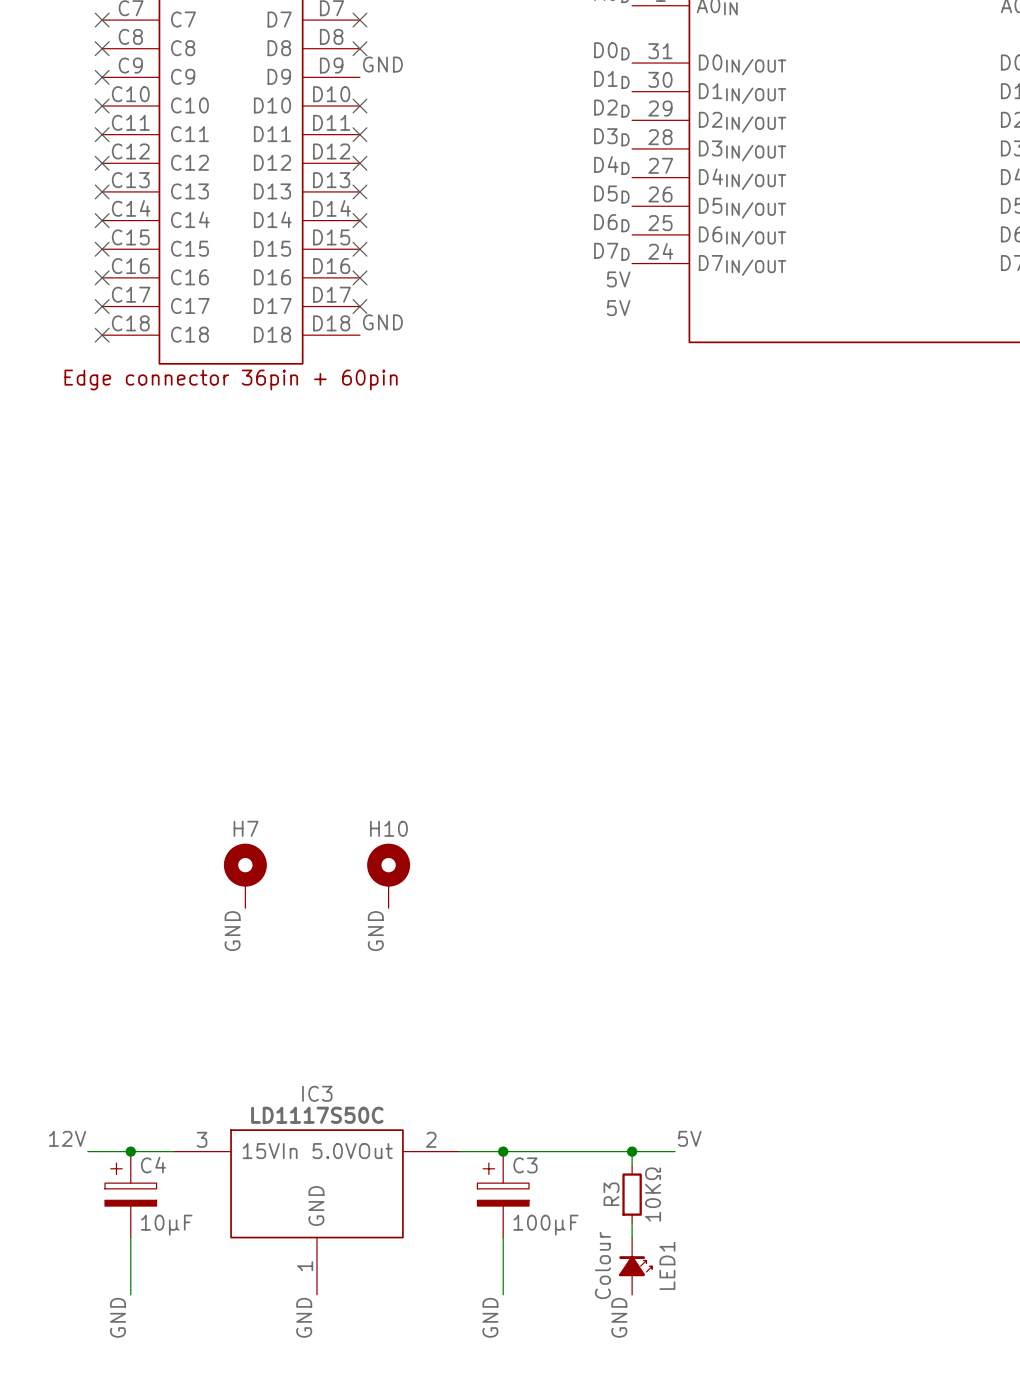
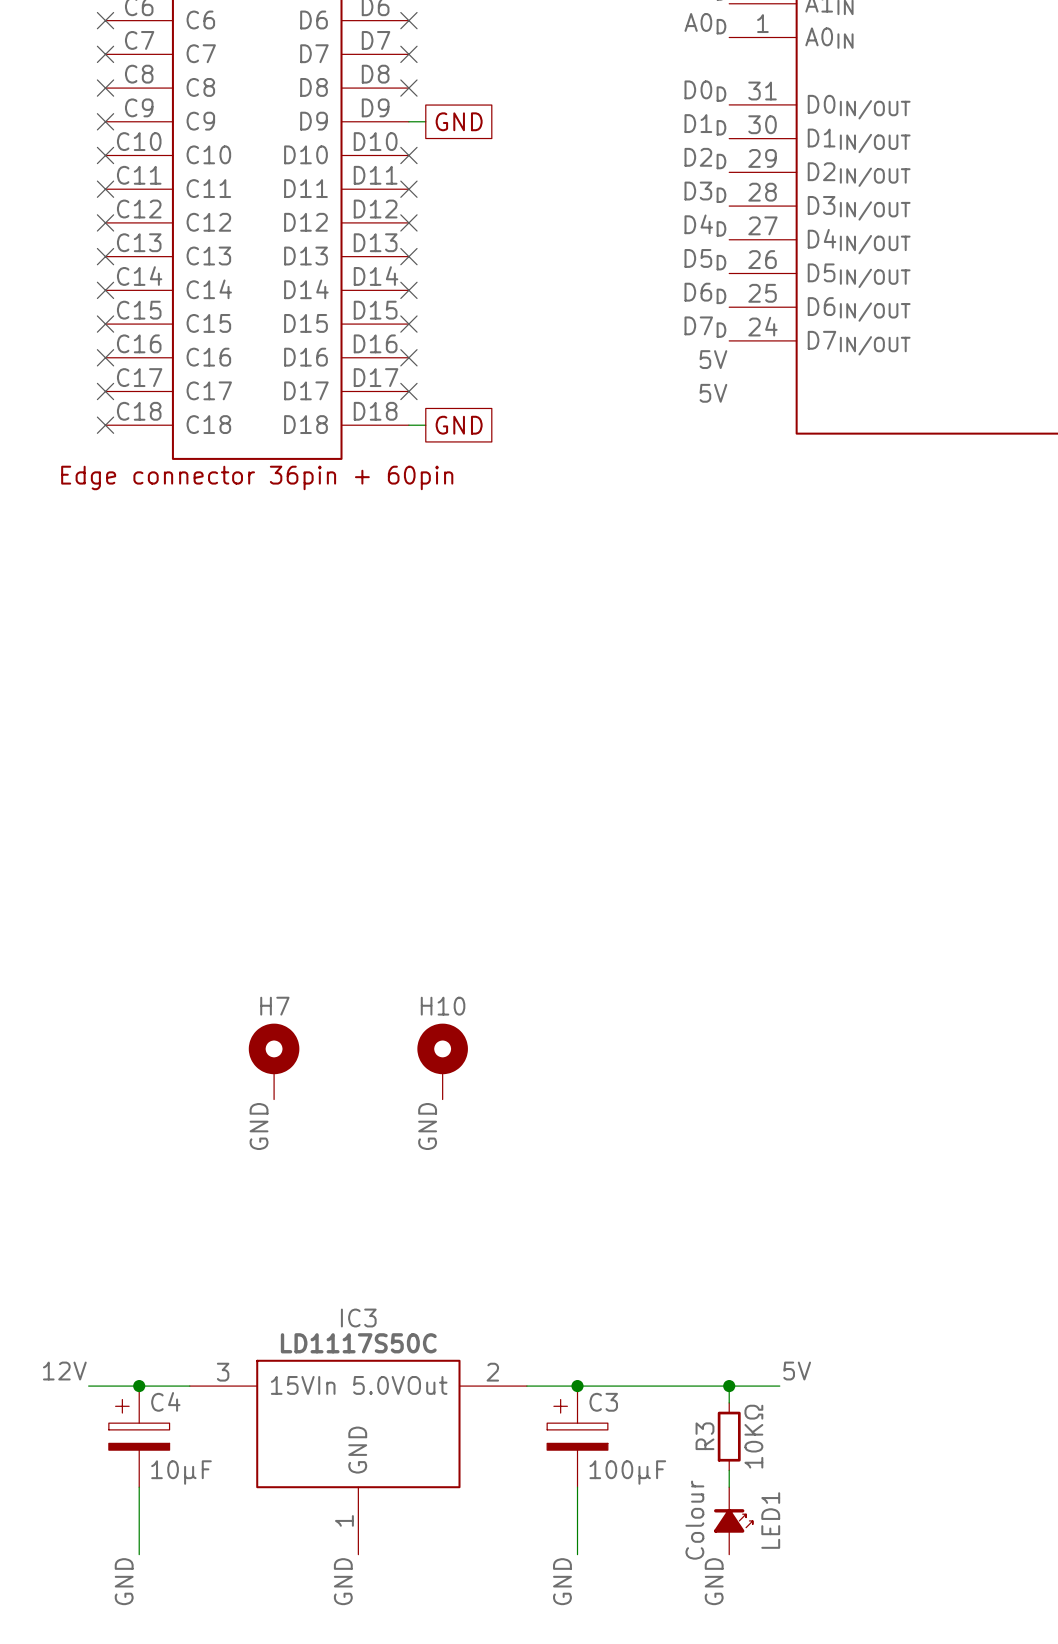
label: GND (382, 64) -> none
wire: none -> (408, 121) (425, 121)
global label: none -> GND (459, 121)
label: GND (382, 322) -> none
wire: none -> (408, 425) (425, 425)
global label: none -> GND (459, 425)

